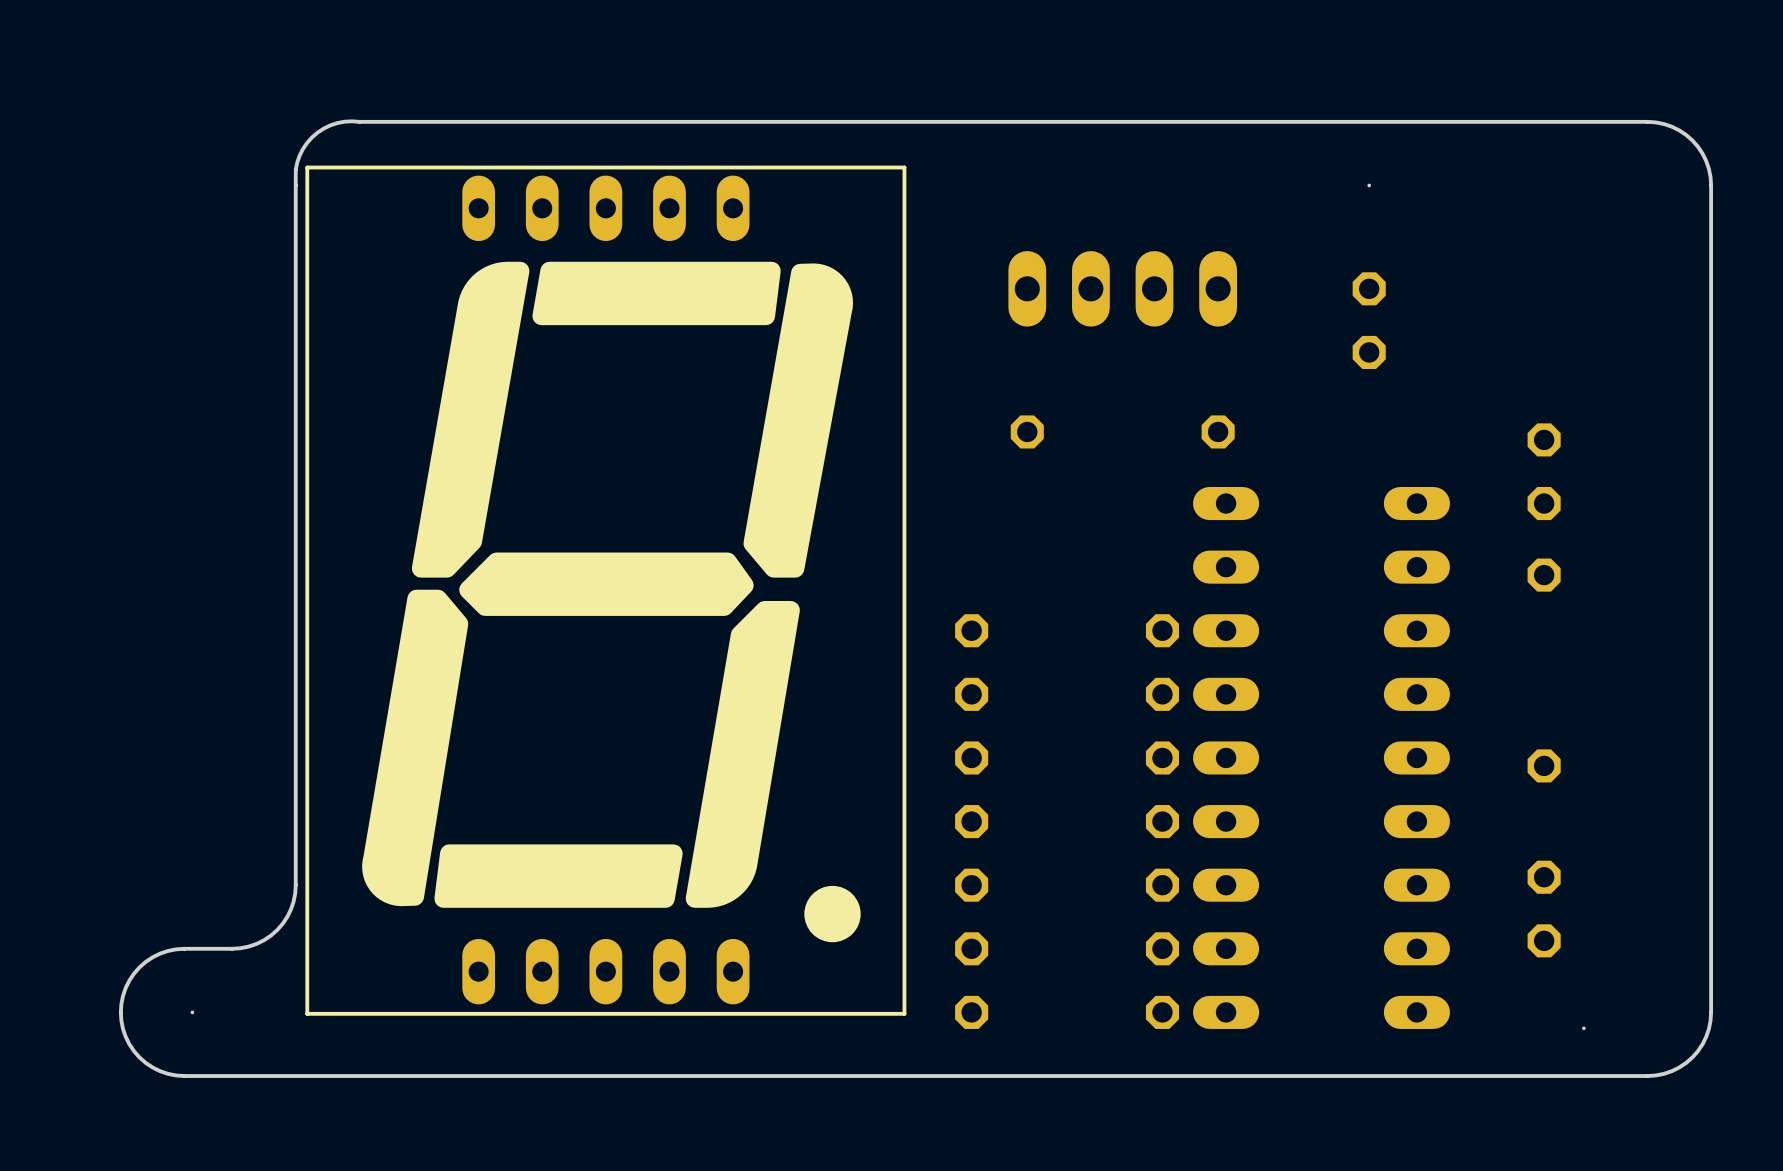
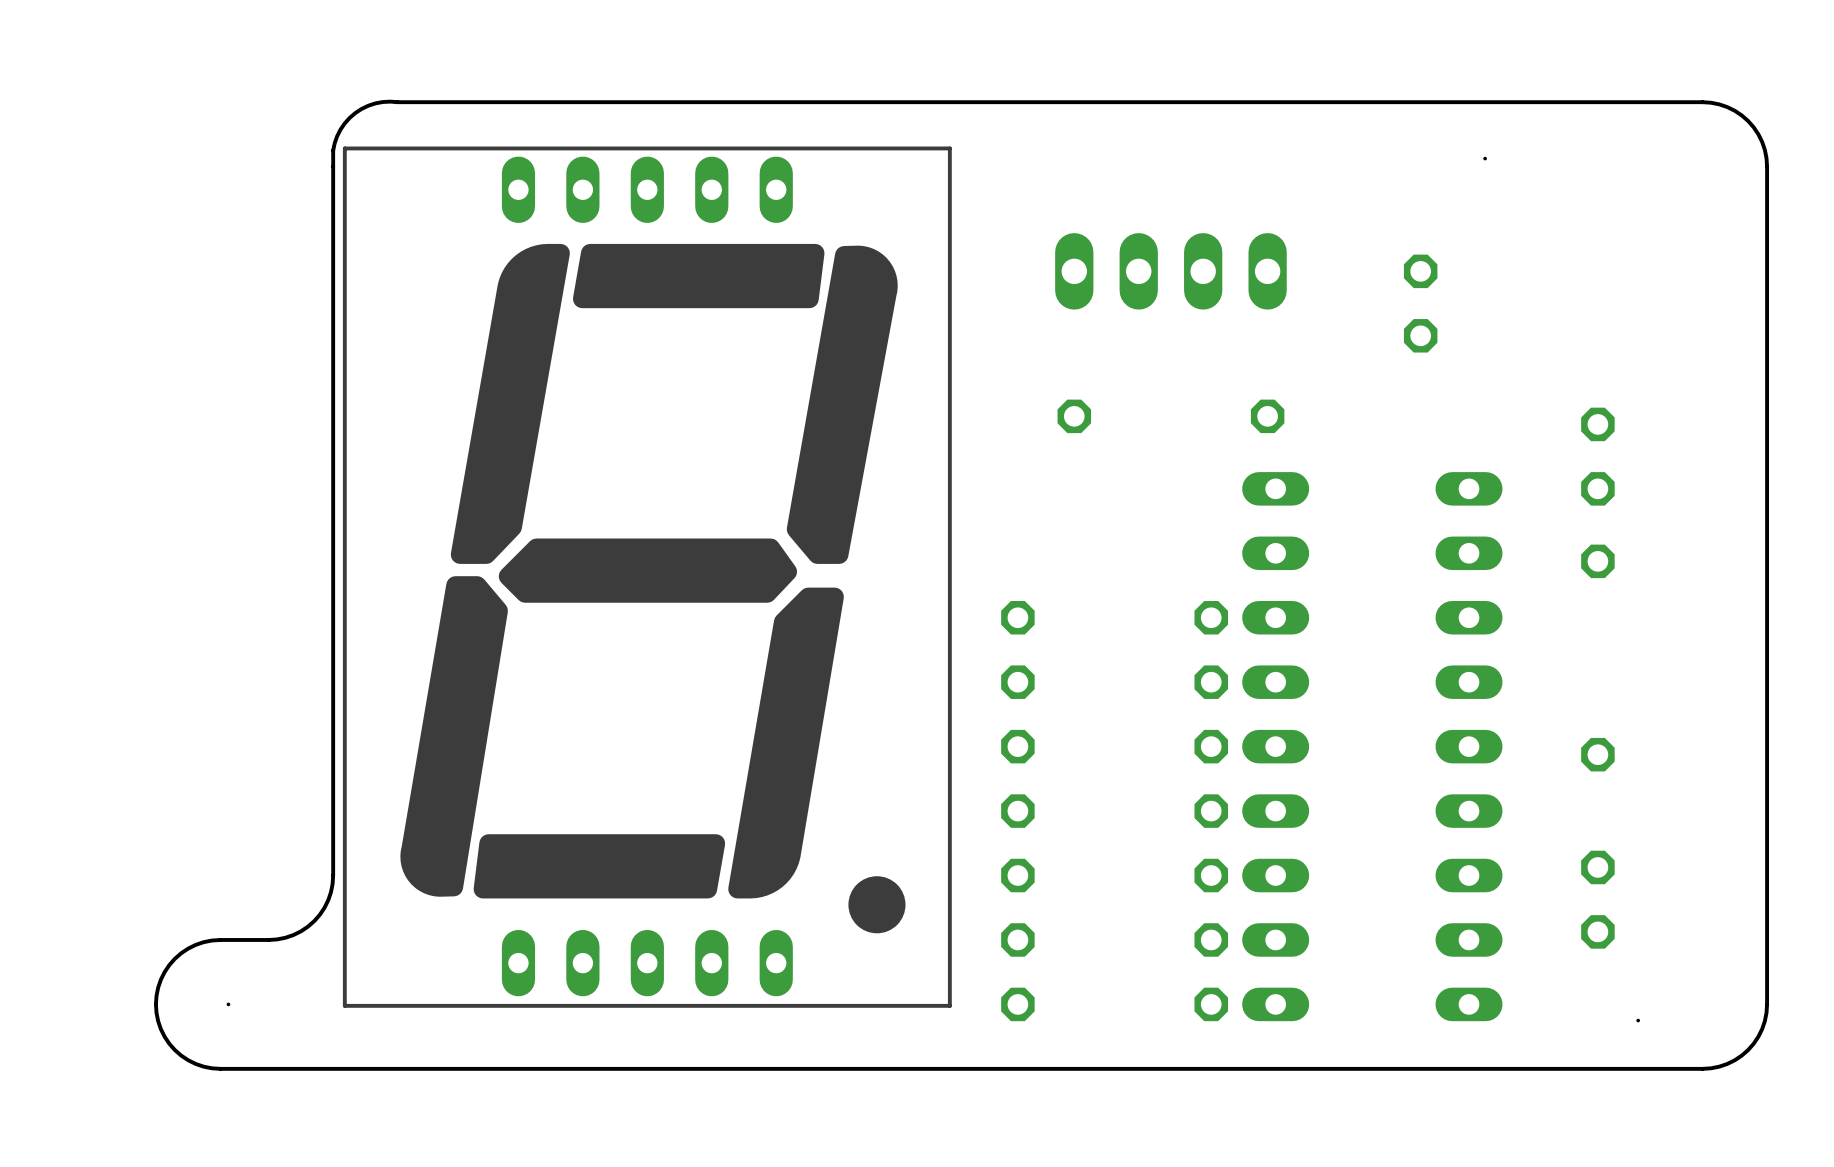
hole position: (1369, 185) -> (1485, 158)

